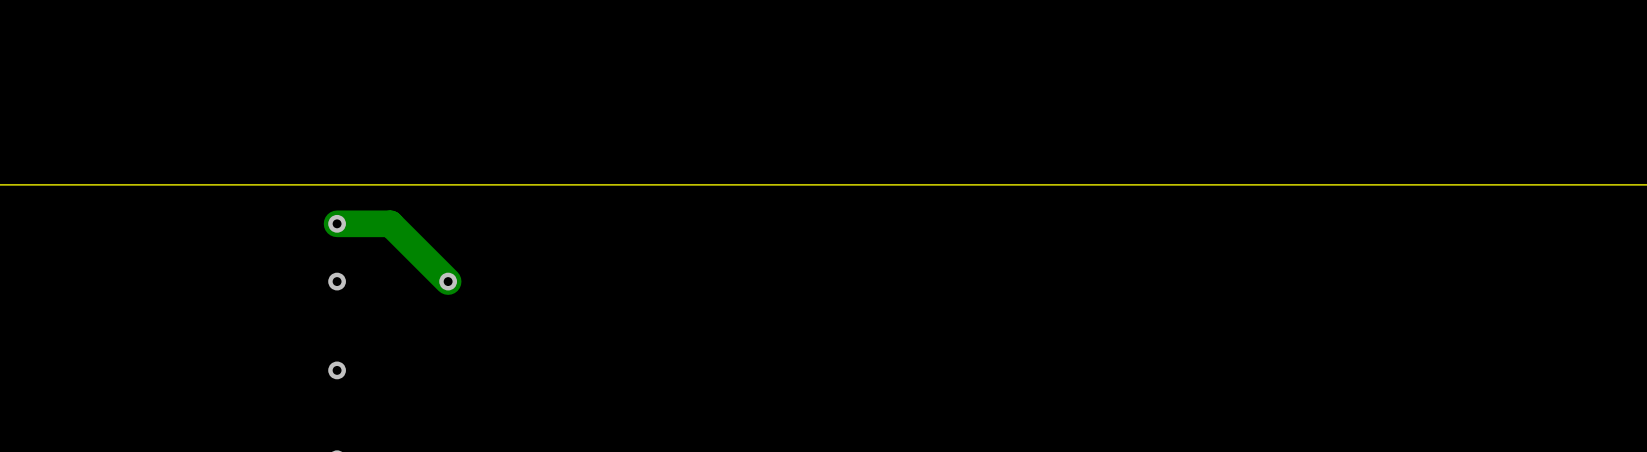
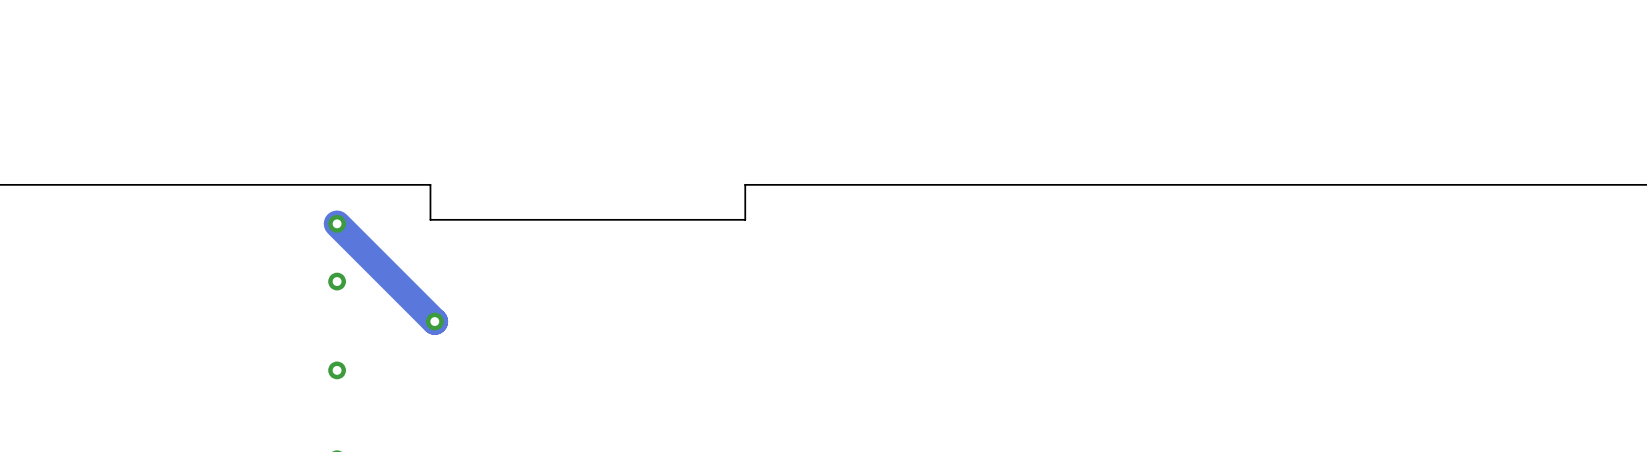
board edge: (745, 184) (430, 184) -> (745, 184) (745, 219) (430, 219) (430, 184)
track: (337, 223) (390, 223) (448, 281) -> (337, 223) (434, 321)
via position: (448, 281) -> (434, 321)

